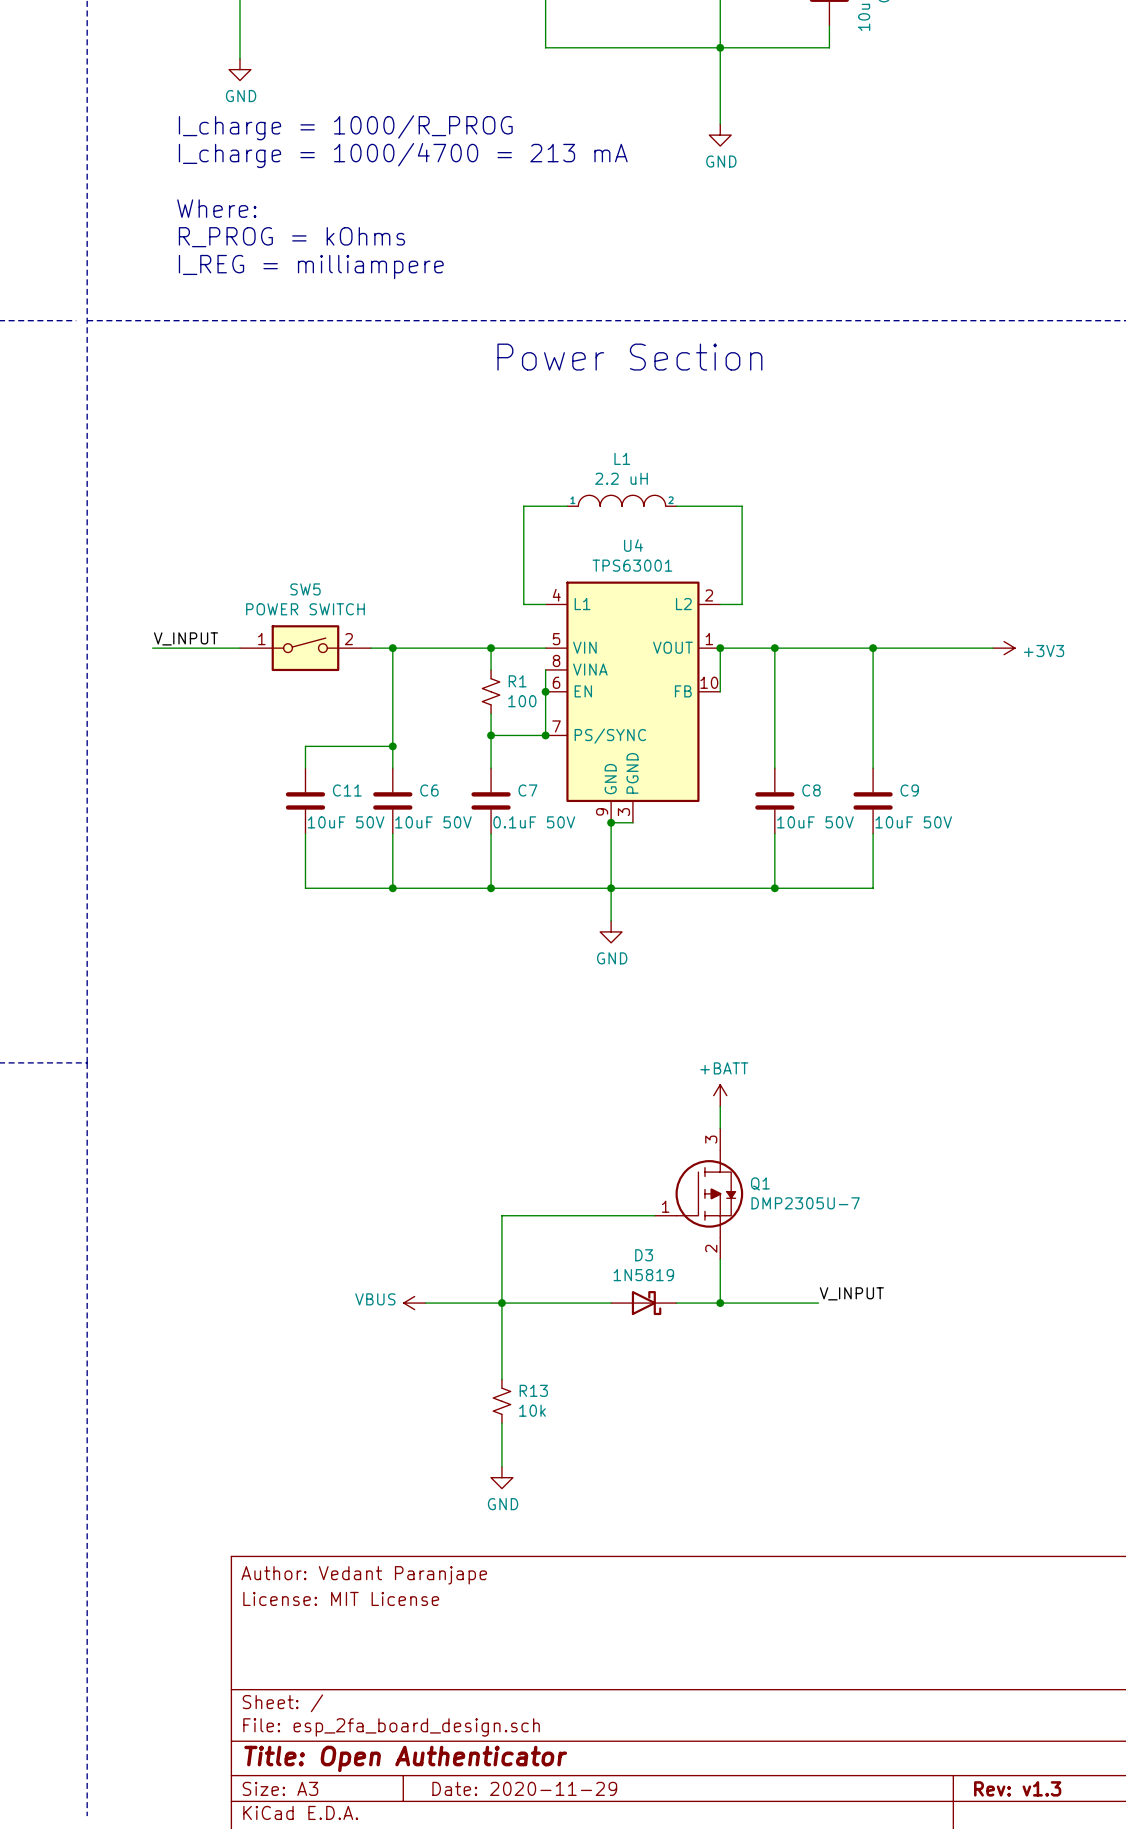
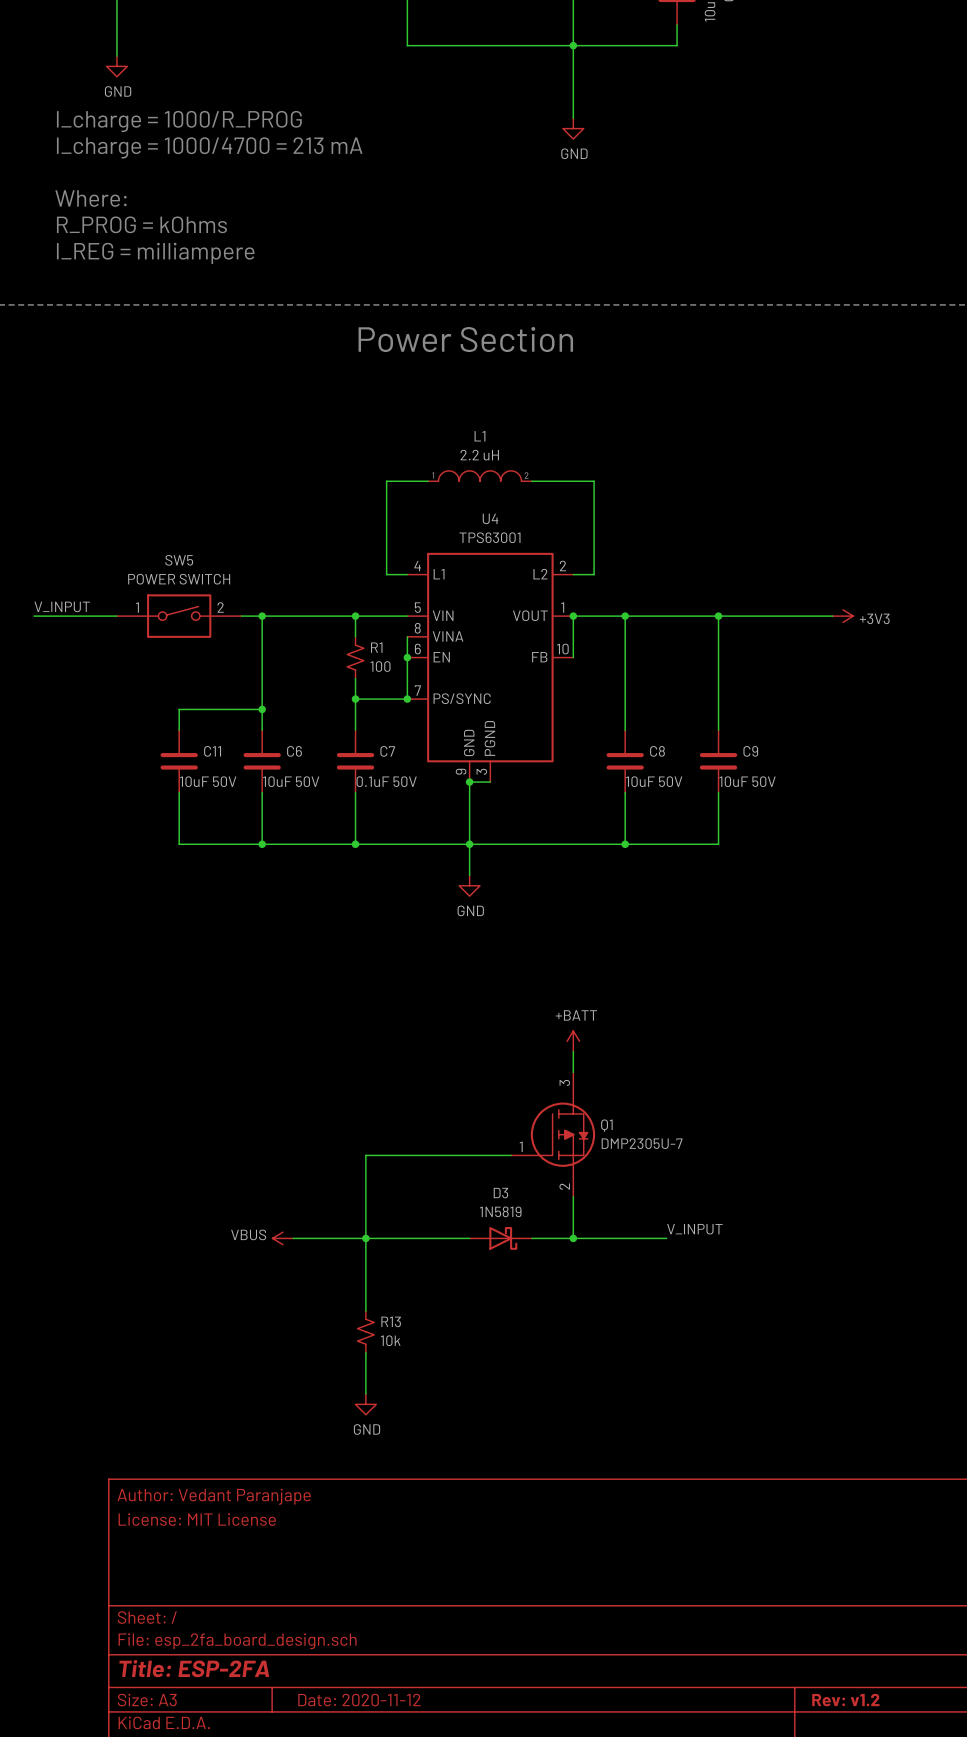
title block: Title: Open Authenticator (405, 1758) -> Title: ESP-2FA (194, 1668)
title block: Date: 2020-11-29 (524, 1788) -> Date: 2020-11-12 (359, 1700)
title block: Rev: v1.3 (1017, 1788) -> Rev: v1.2 (845, 1700)

